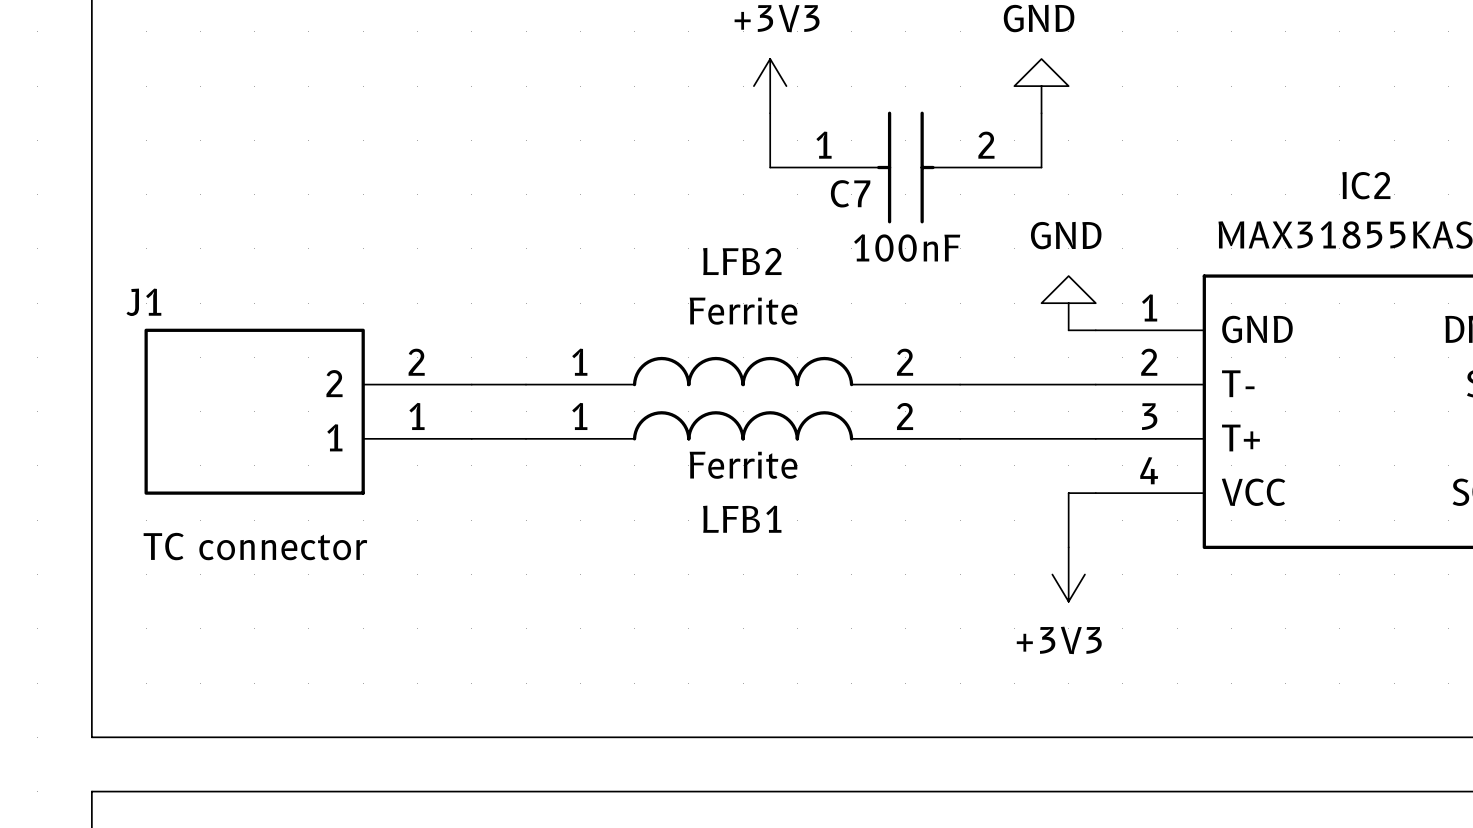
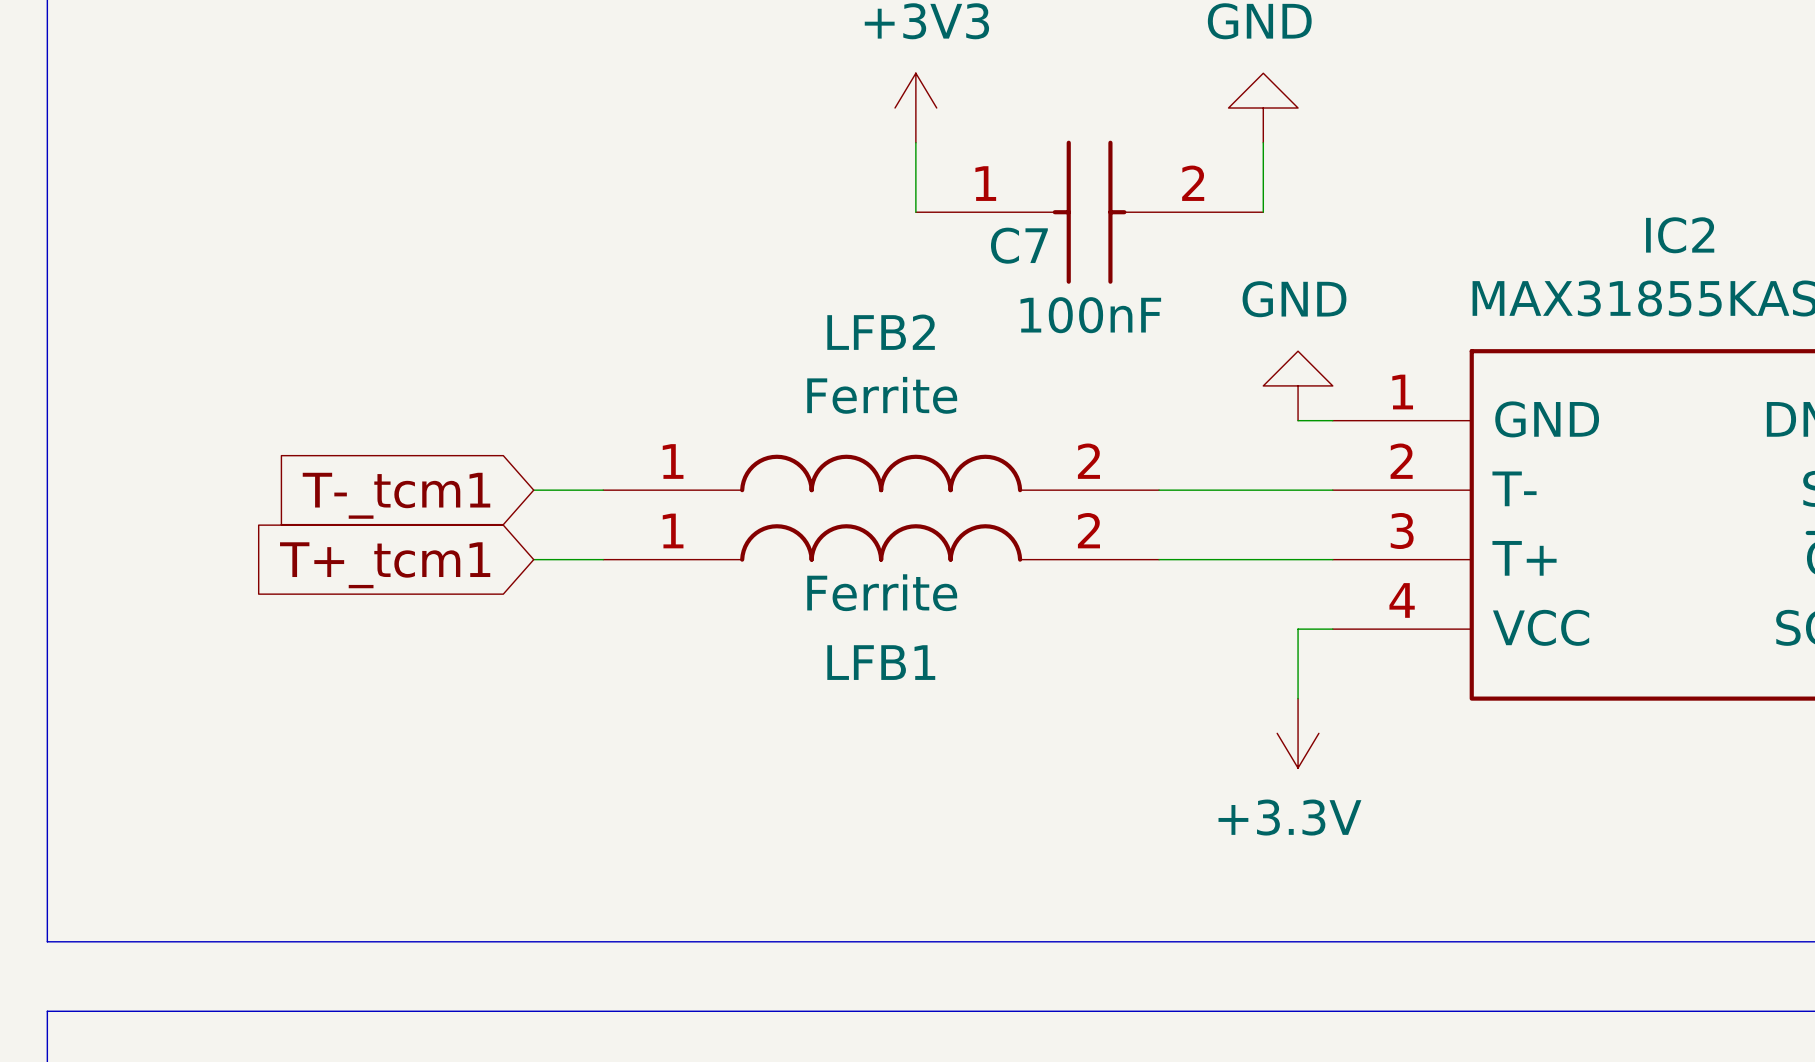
global label: none -> T-_tcm1 (396, 495)
J1: TC connector (308, 411) -> none
global label: none -> T+_tcm1 (385, 565)
power symbol: +3V3 (1068, 574) -> +3.3V (1298, 733)

